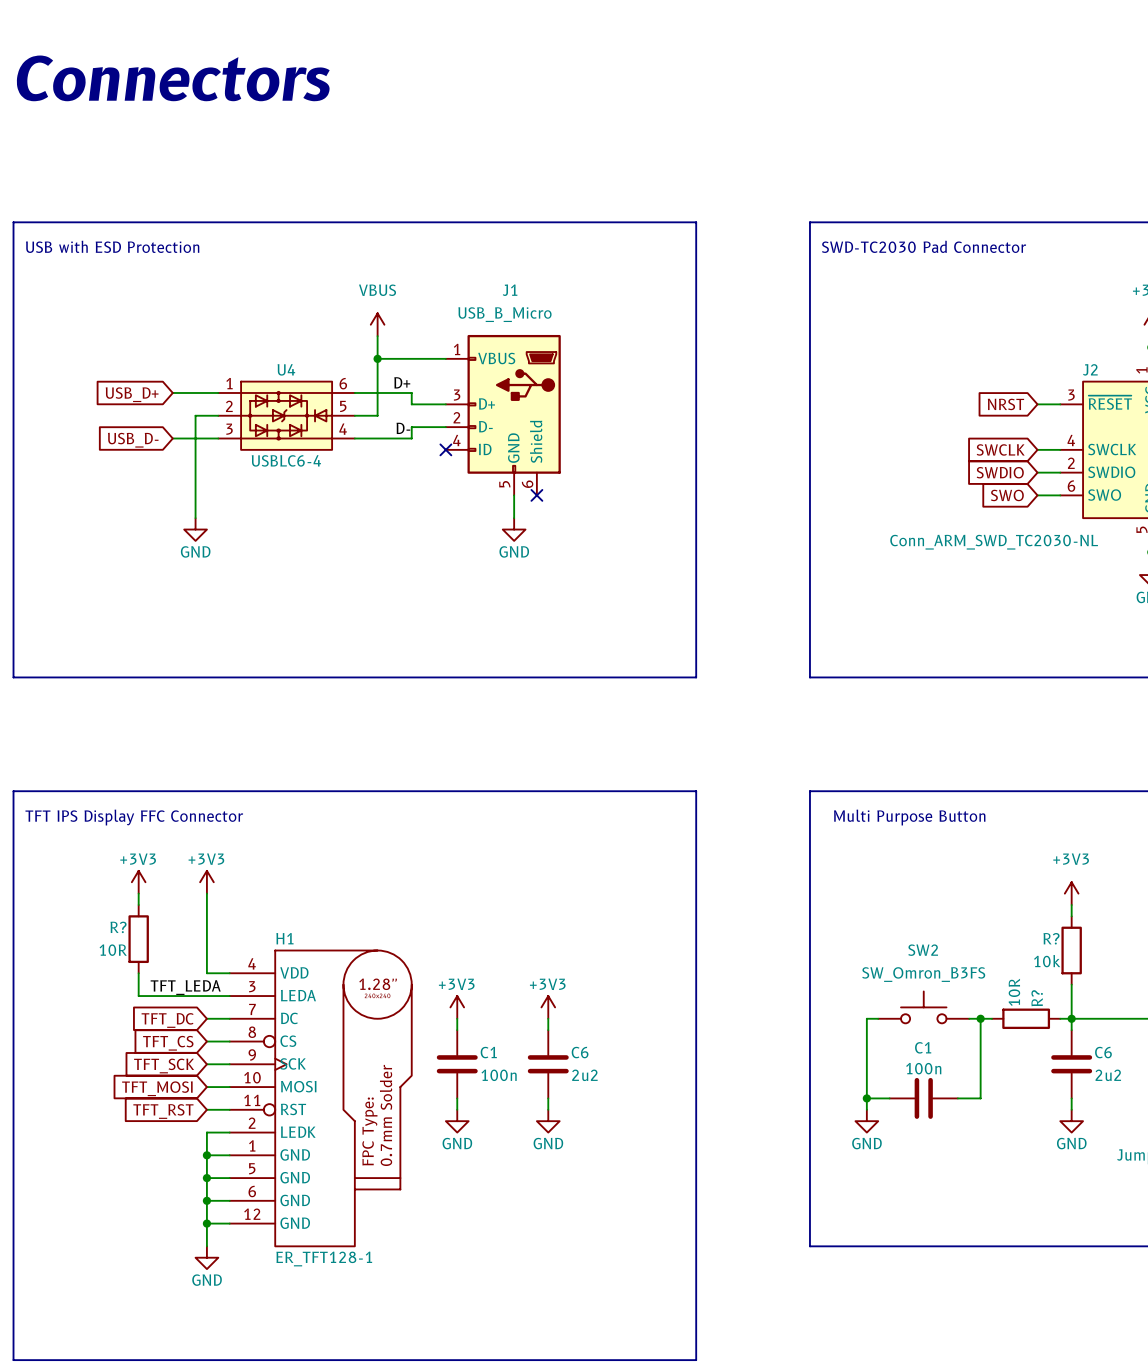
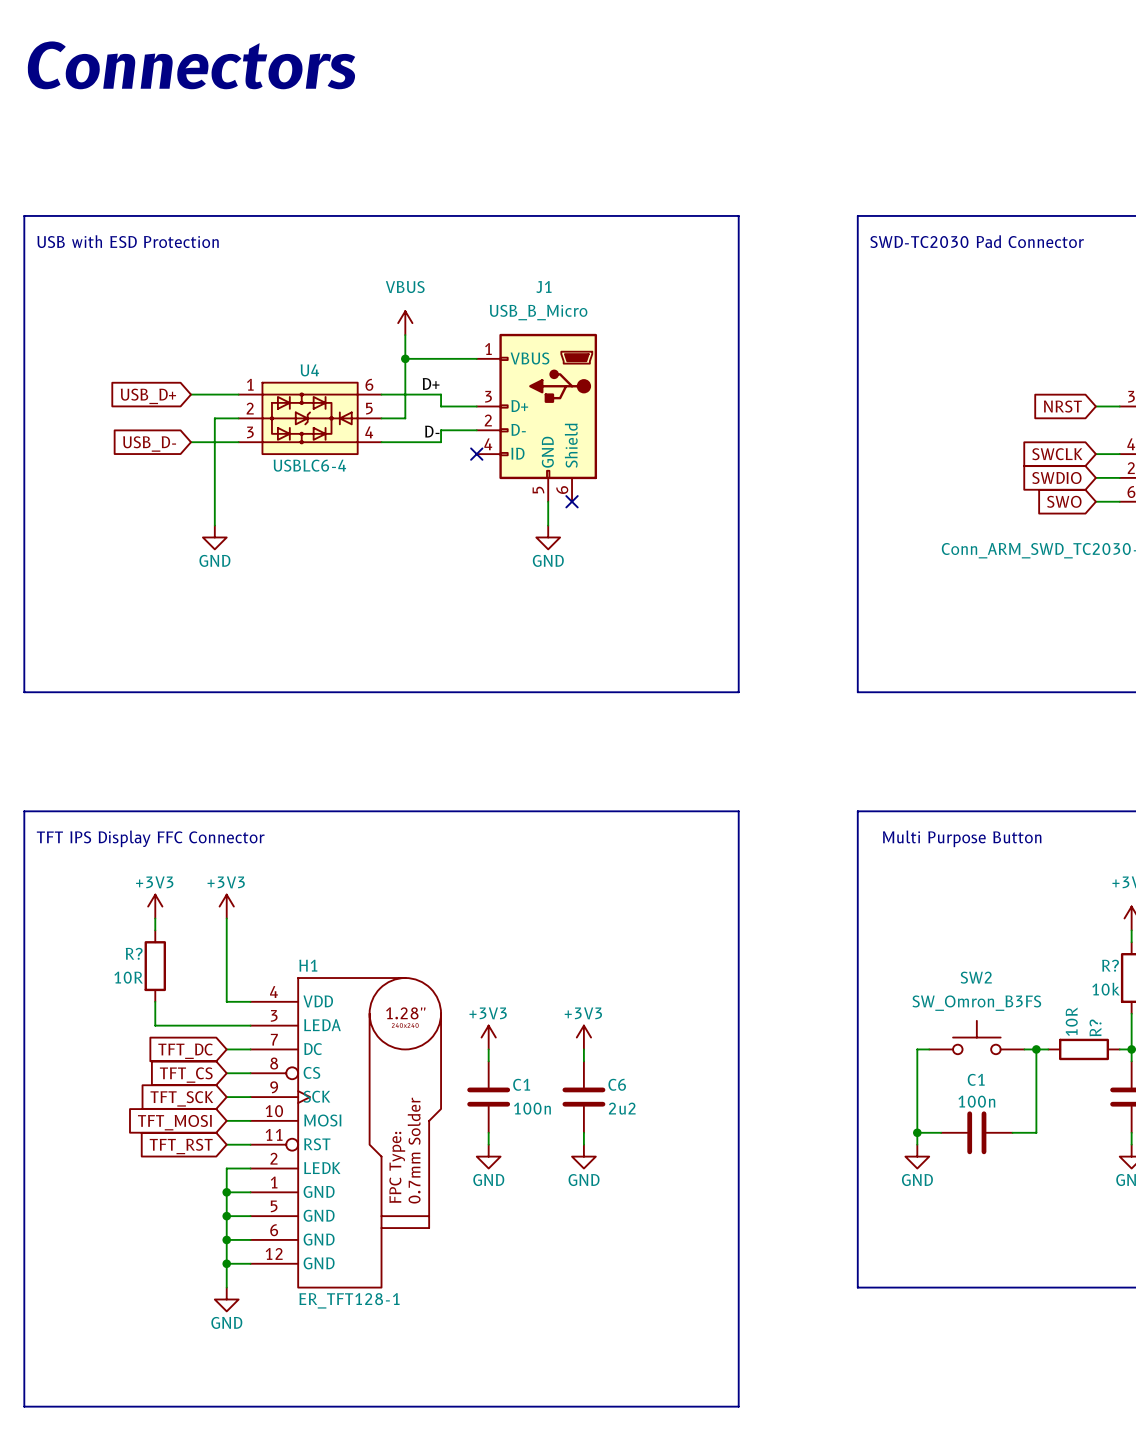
label: TFT_LEDA (185, 987) -> none

